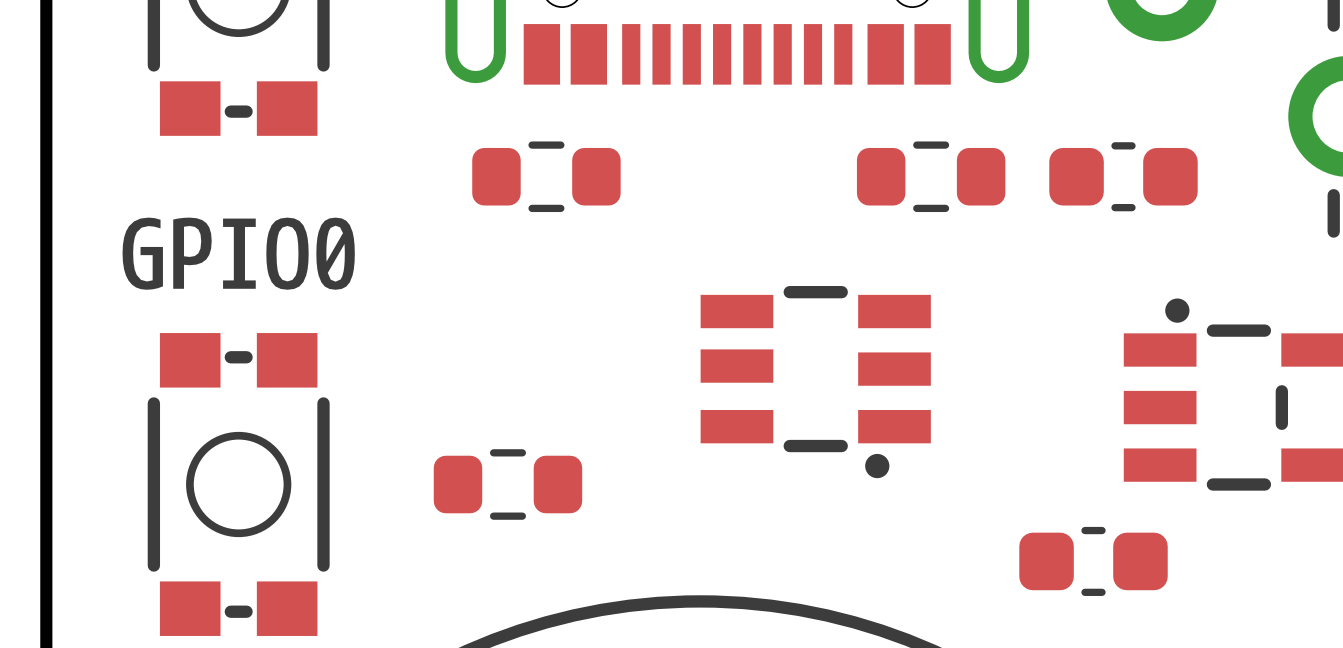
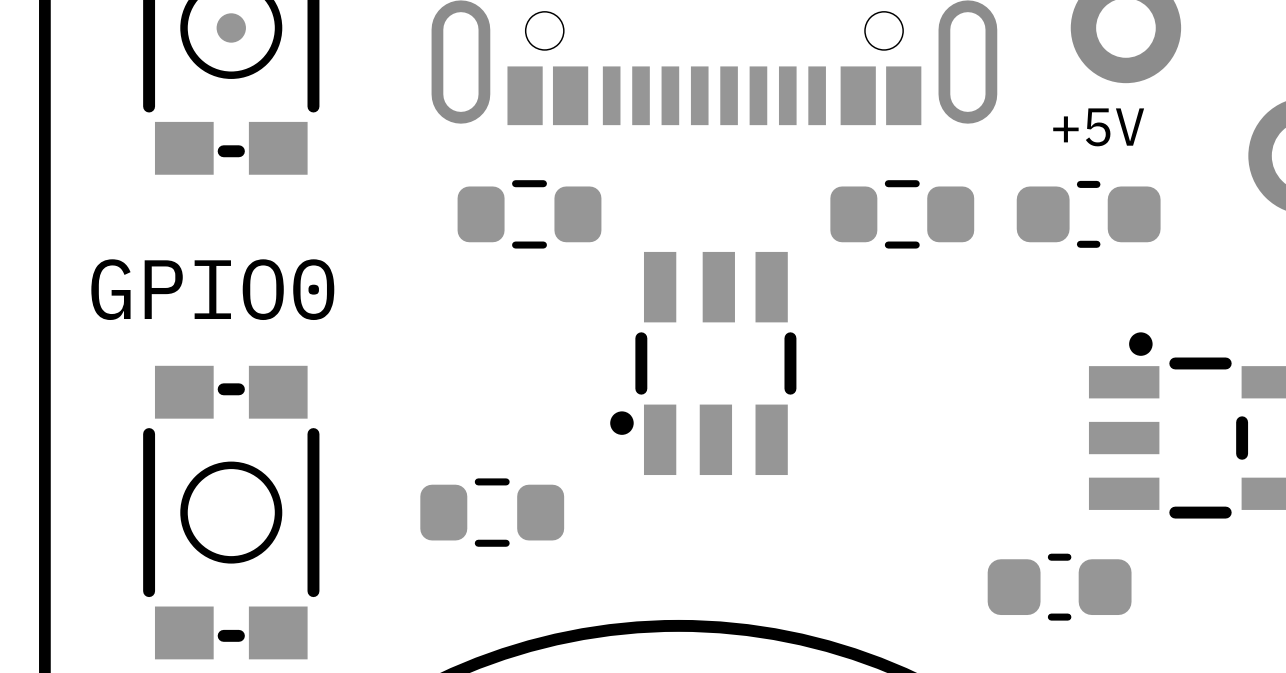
text: none -> +5V (1098, 127)
drawing: [122, 217, 355, 290] -> none
text: none -> GPIO0 (212, 289)
part rotation: 0° (815, 382) -> 90° clockwise (703, 363)

